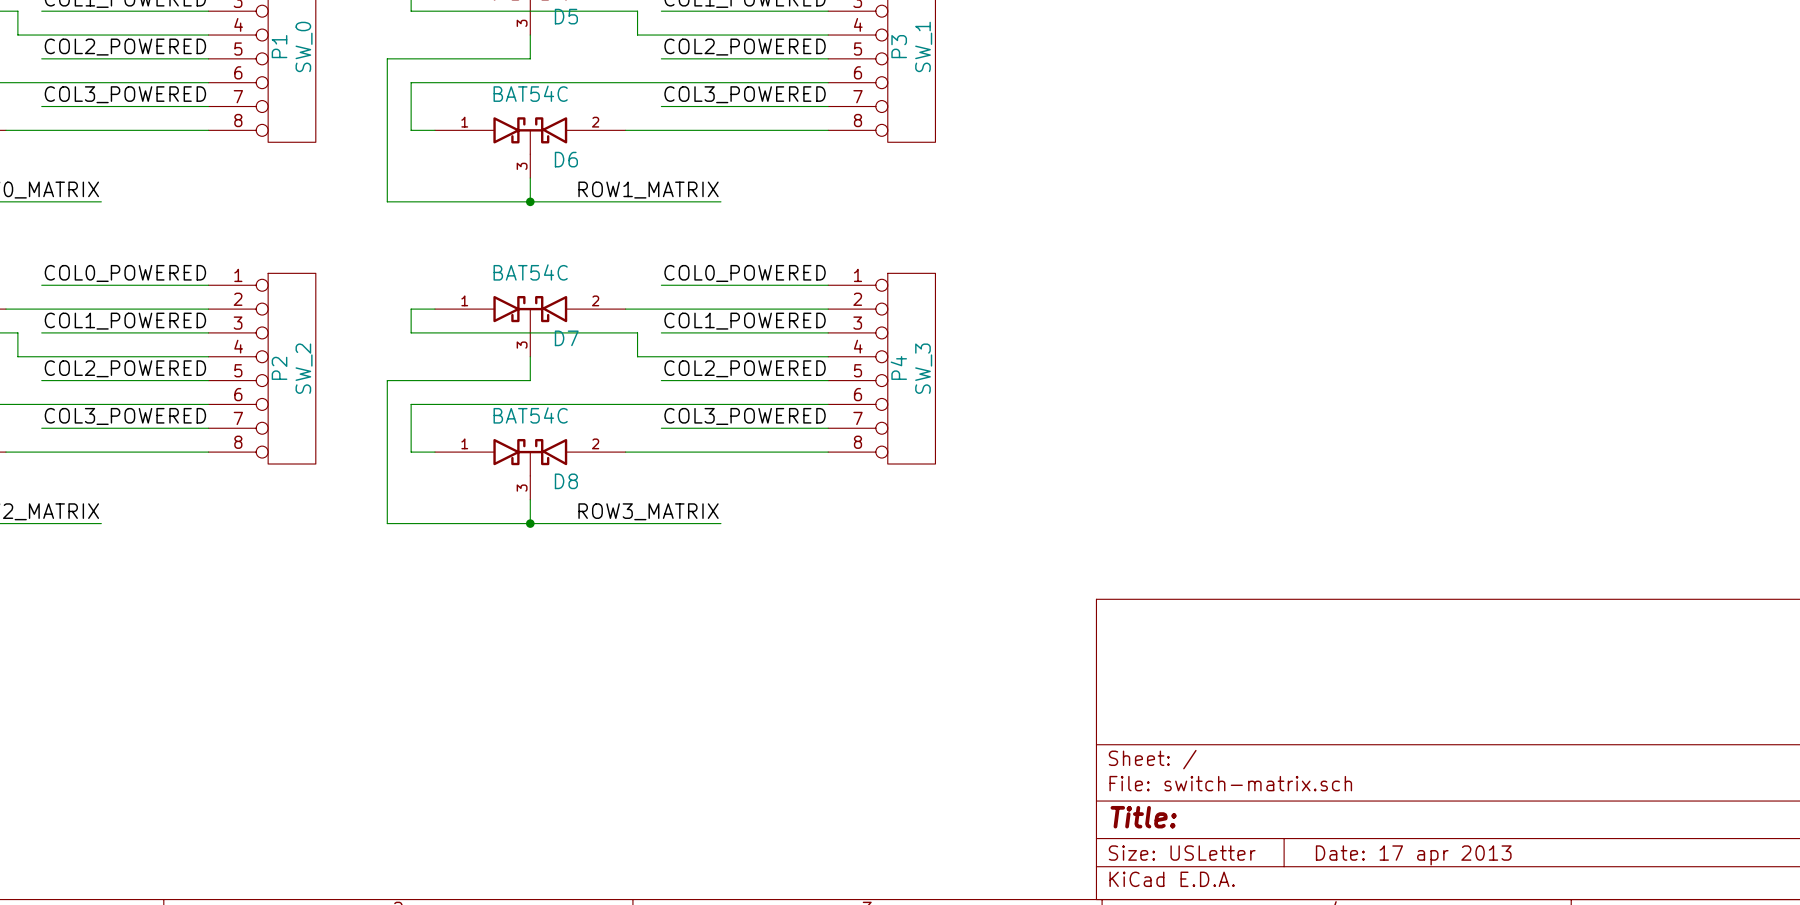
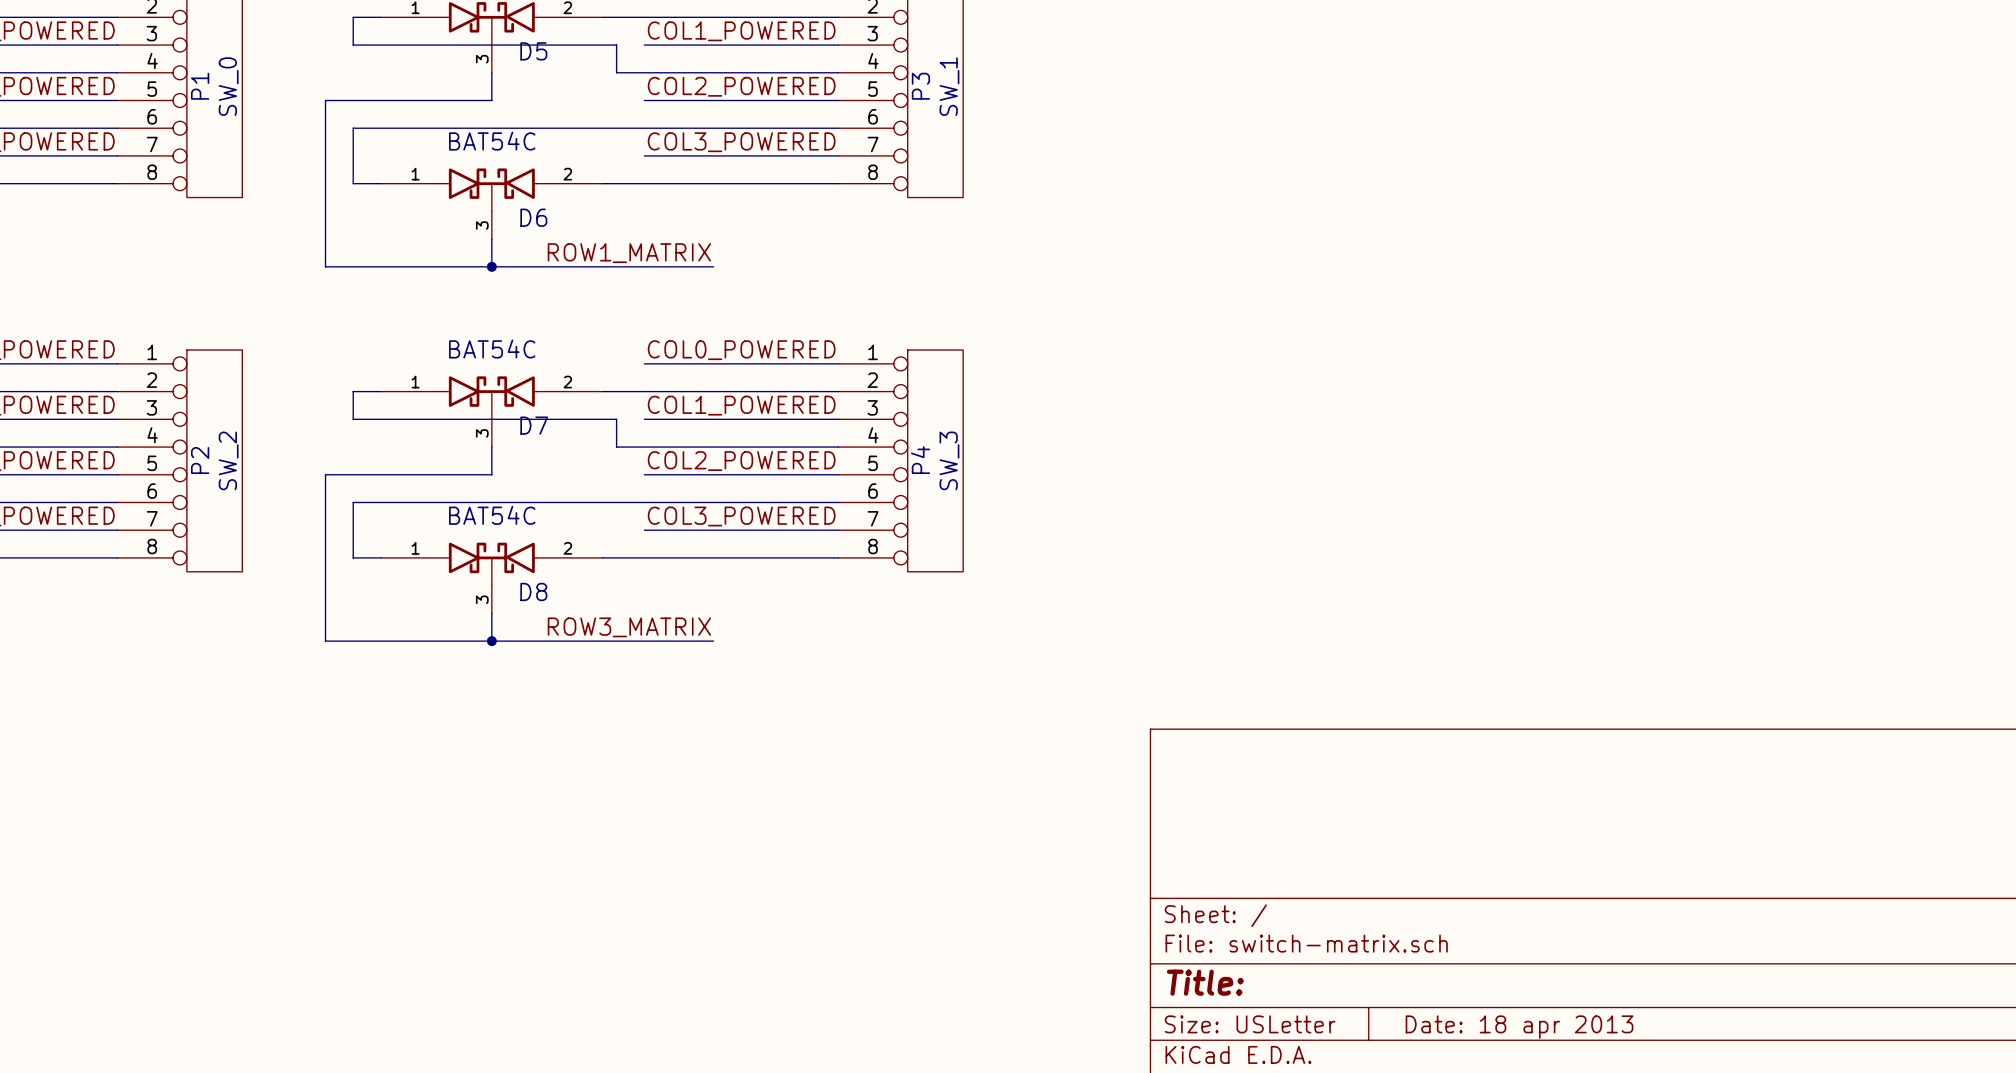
title block: Date: 17 apr 2013 (1413, 855) -> Date: 18 apr 2013 (1519, 1027)

